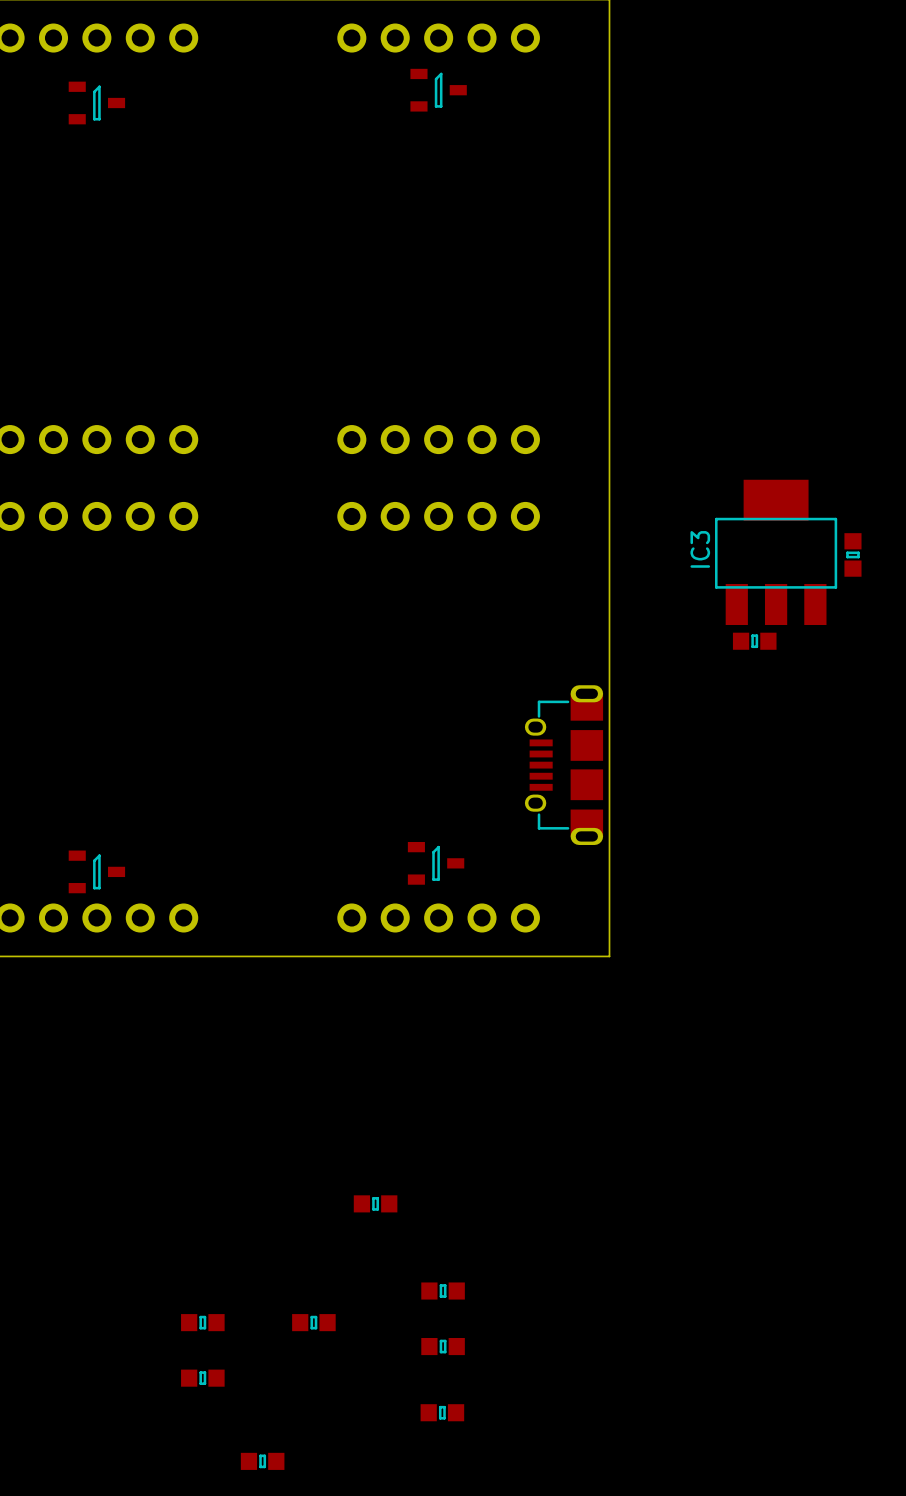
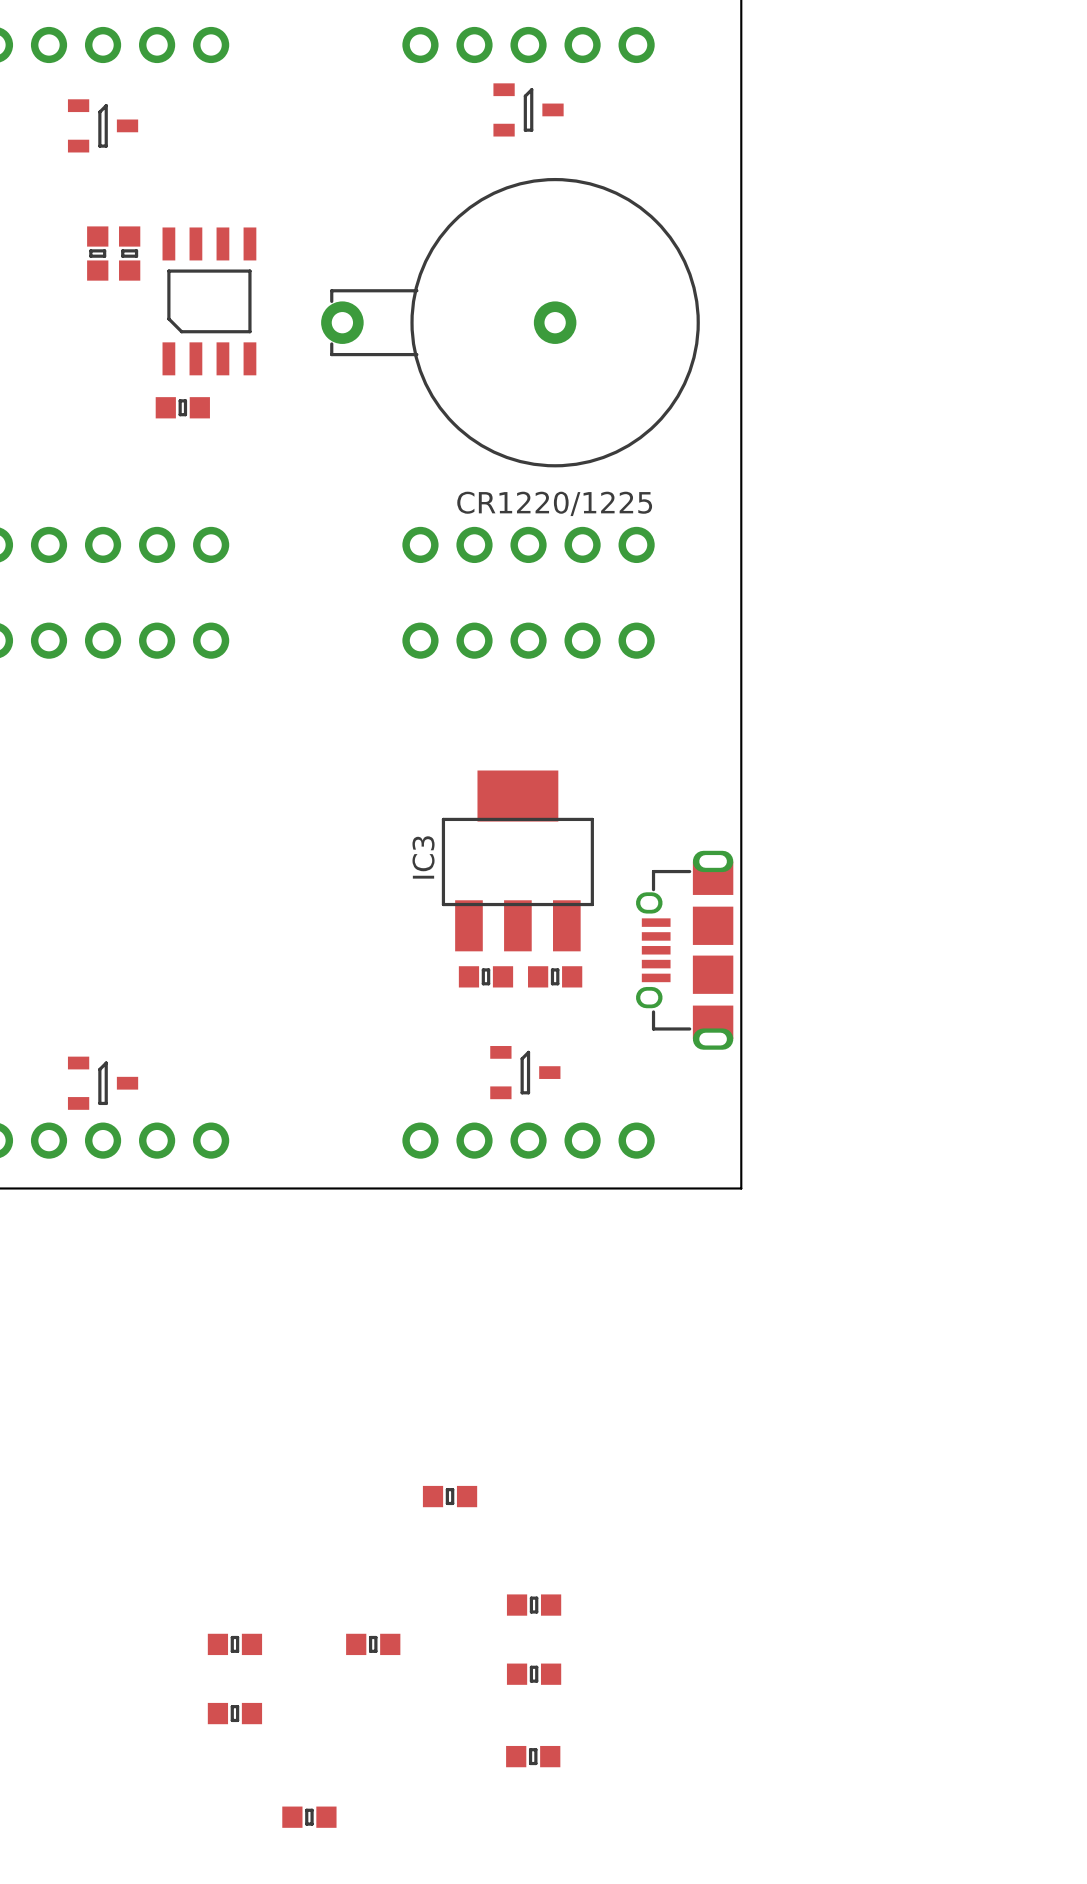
part: none -> (97, 253)
part: none -> (129, 253)
part: none -> (209, 301)
part: none -> CR1220/1225 (510, 322)
part: none -> (182, 407)
IC3 position: (776, 552) -> (517, 860)
part: (852, 554) -> none
part: (754, 641) -> none
part: none -> (485, 976)
part: none -> (555, 976)

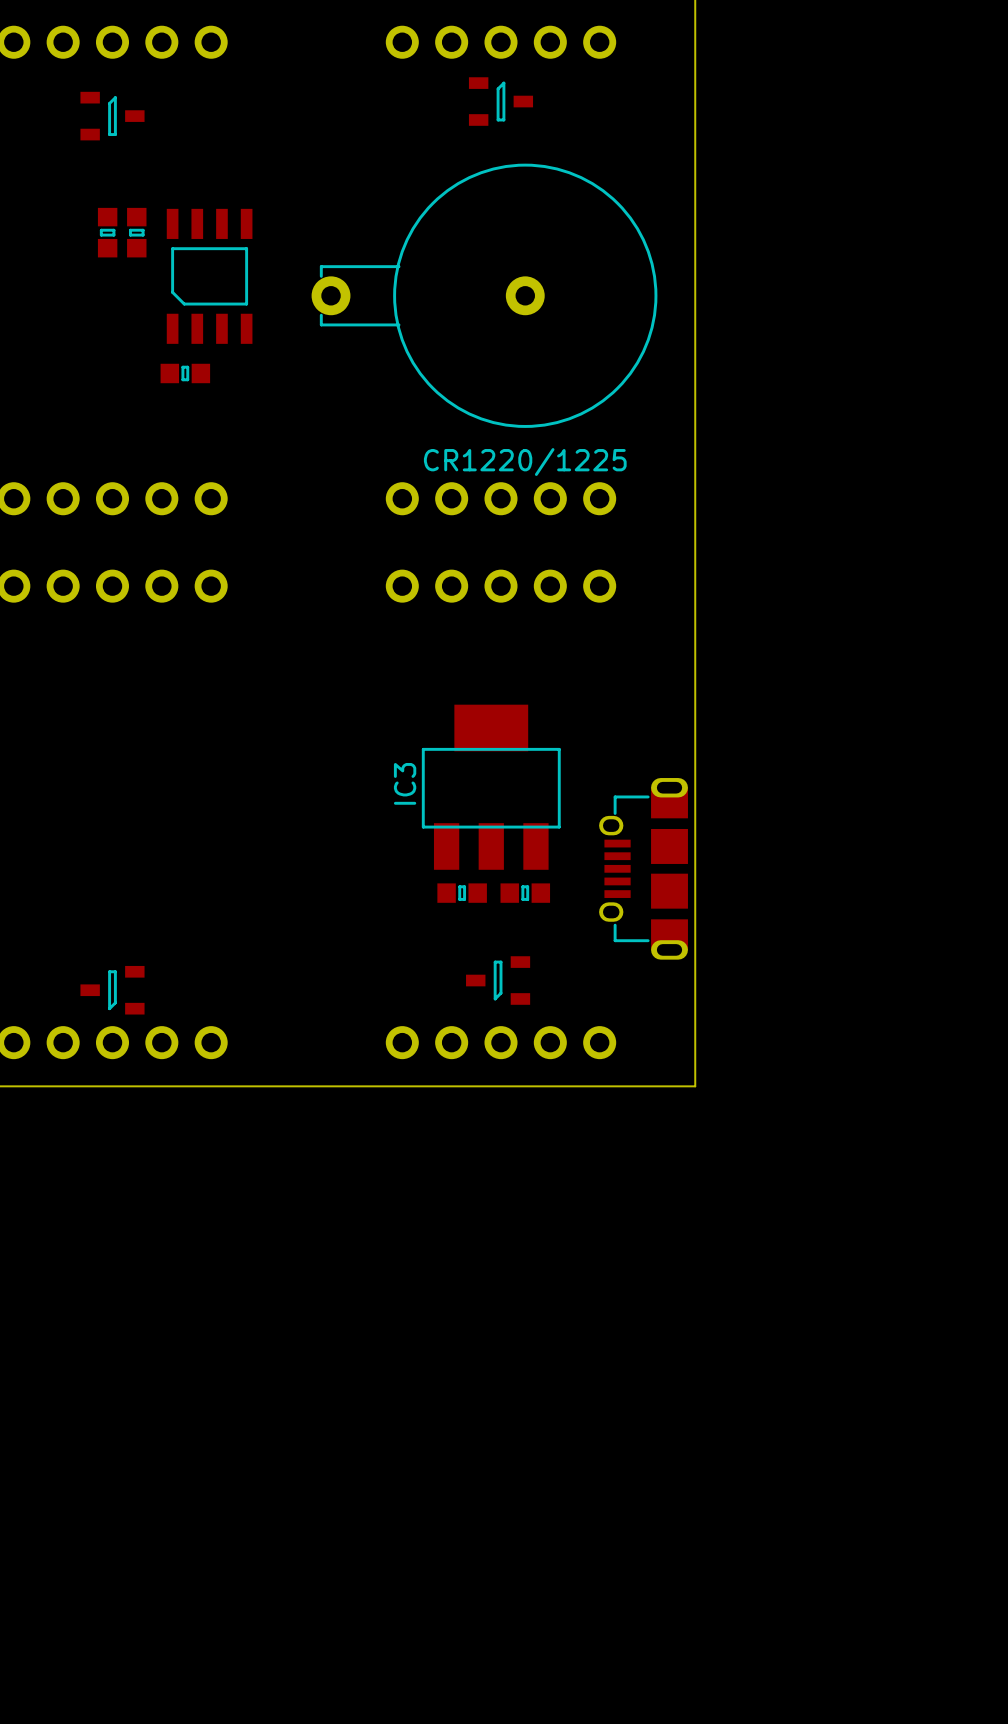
part rotation: 0° (525, 1072) -> 180° (498, 980)
part rotation: 0° (103, 1083) -> 180° (112, 990)
part: (450, 1496) -> none
part: (534, 1605) -> none
part: (234, 1644) -> none
part: (373, 1644) -> none
part: (534, 1674) -> none
part: (234, 1713) -> none
part: (533, 1756) -> none
part: (309, 1817) -> none

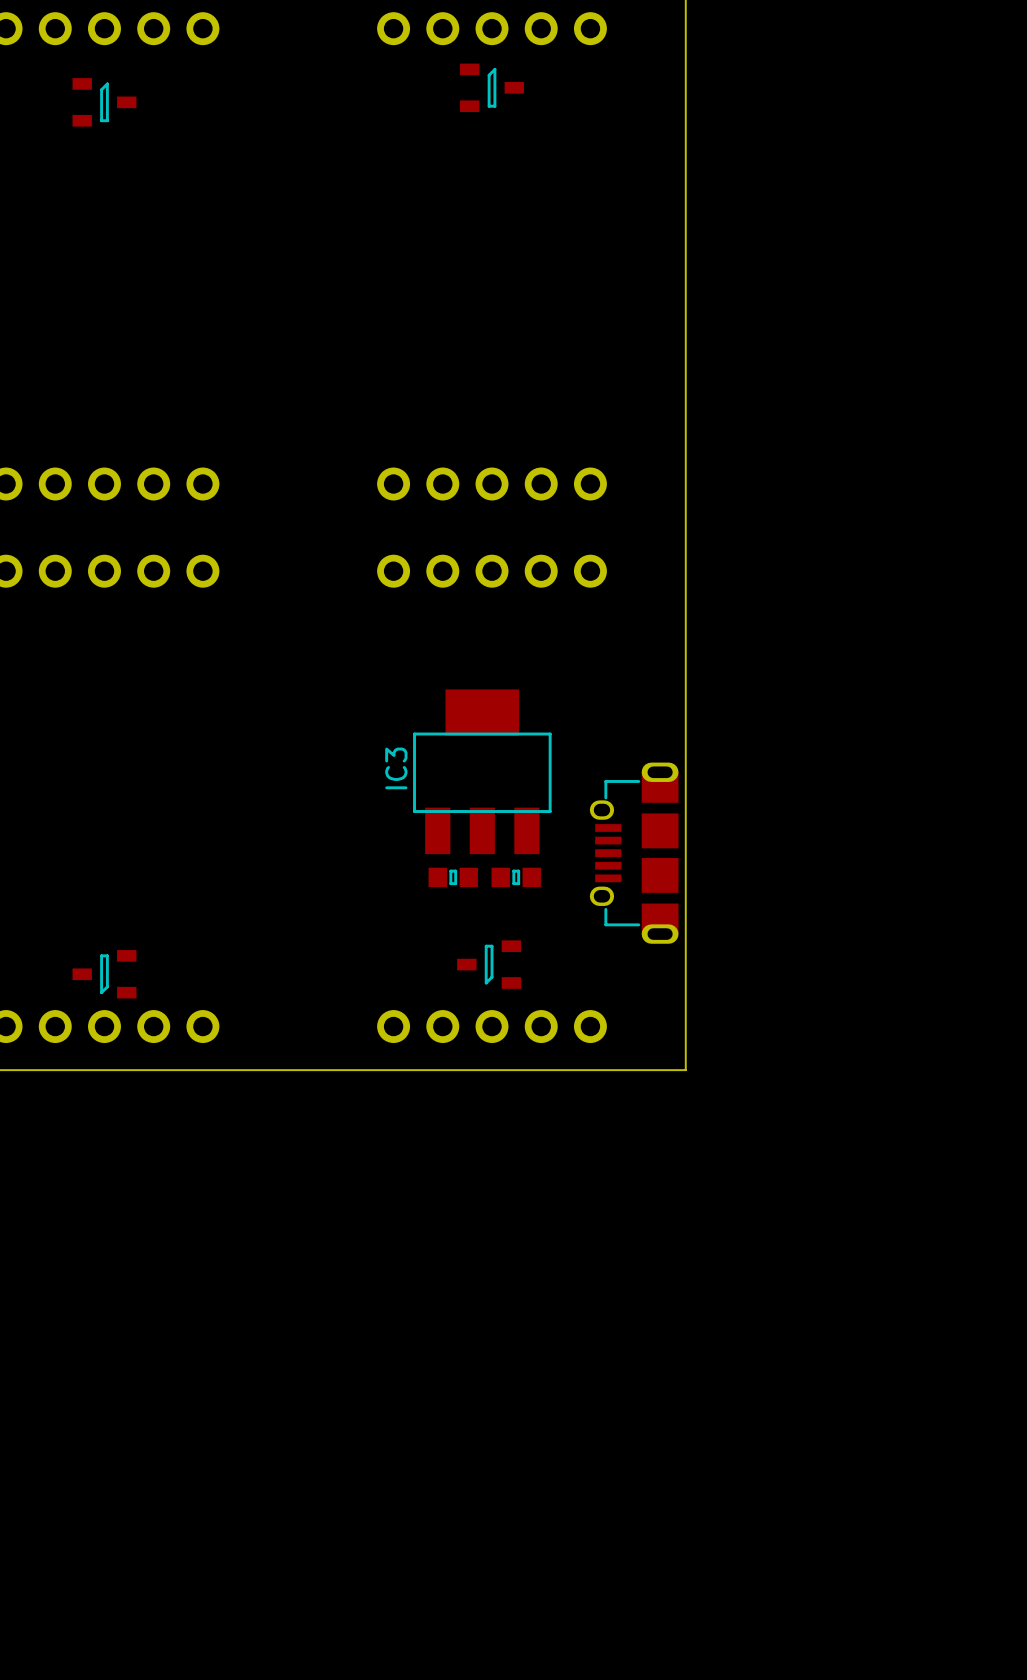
part: (107, 232) -> none
part: (136, 232) -> none
part: (209, 276) -> none
part: CR1220/1225 (484, 295) -> none
part: (185, 373) -> none

